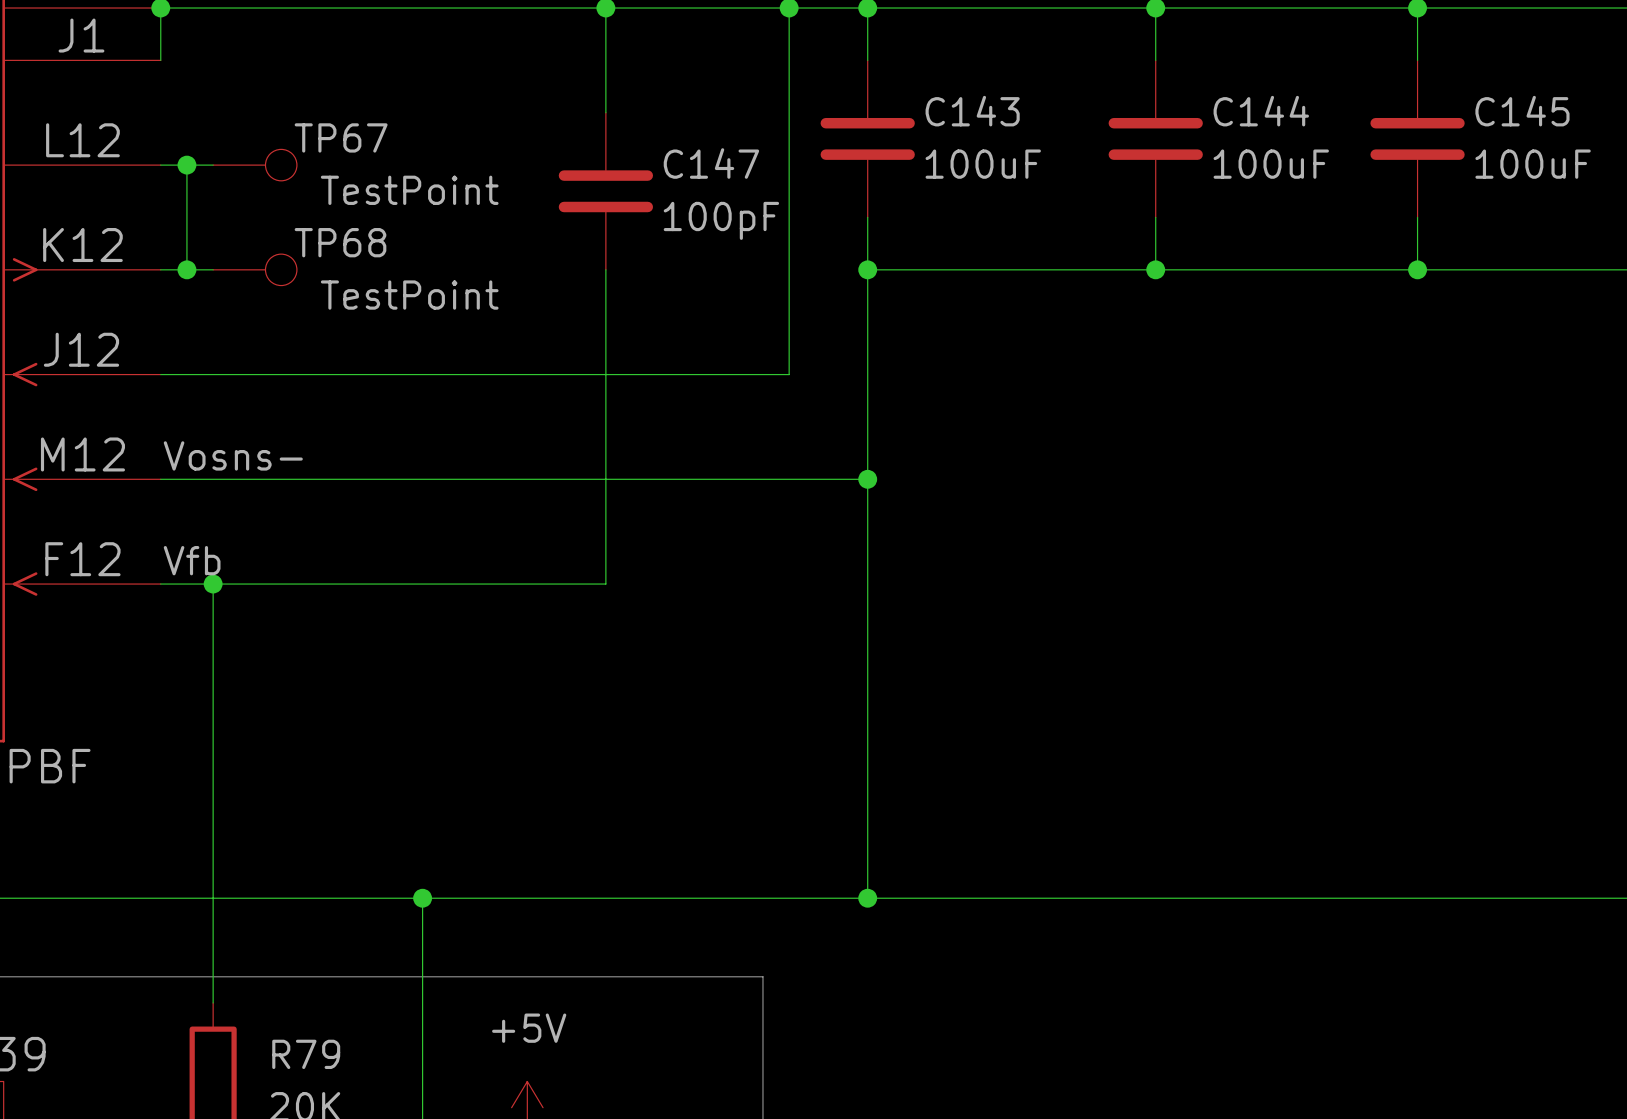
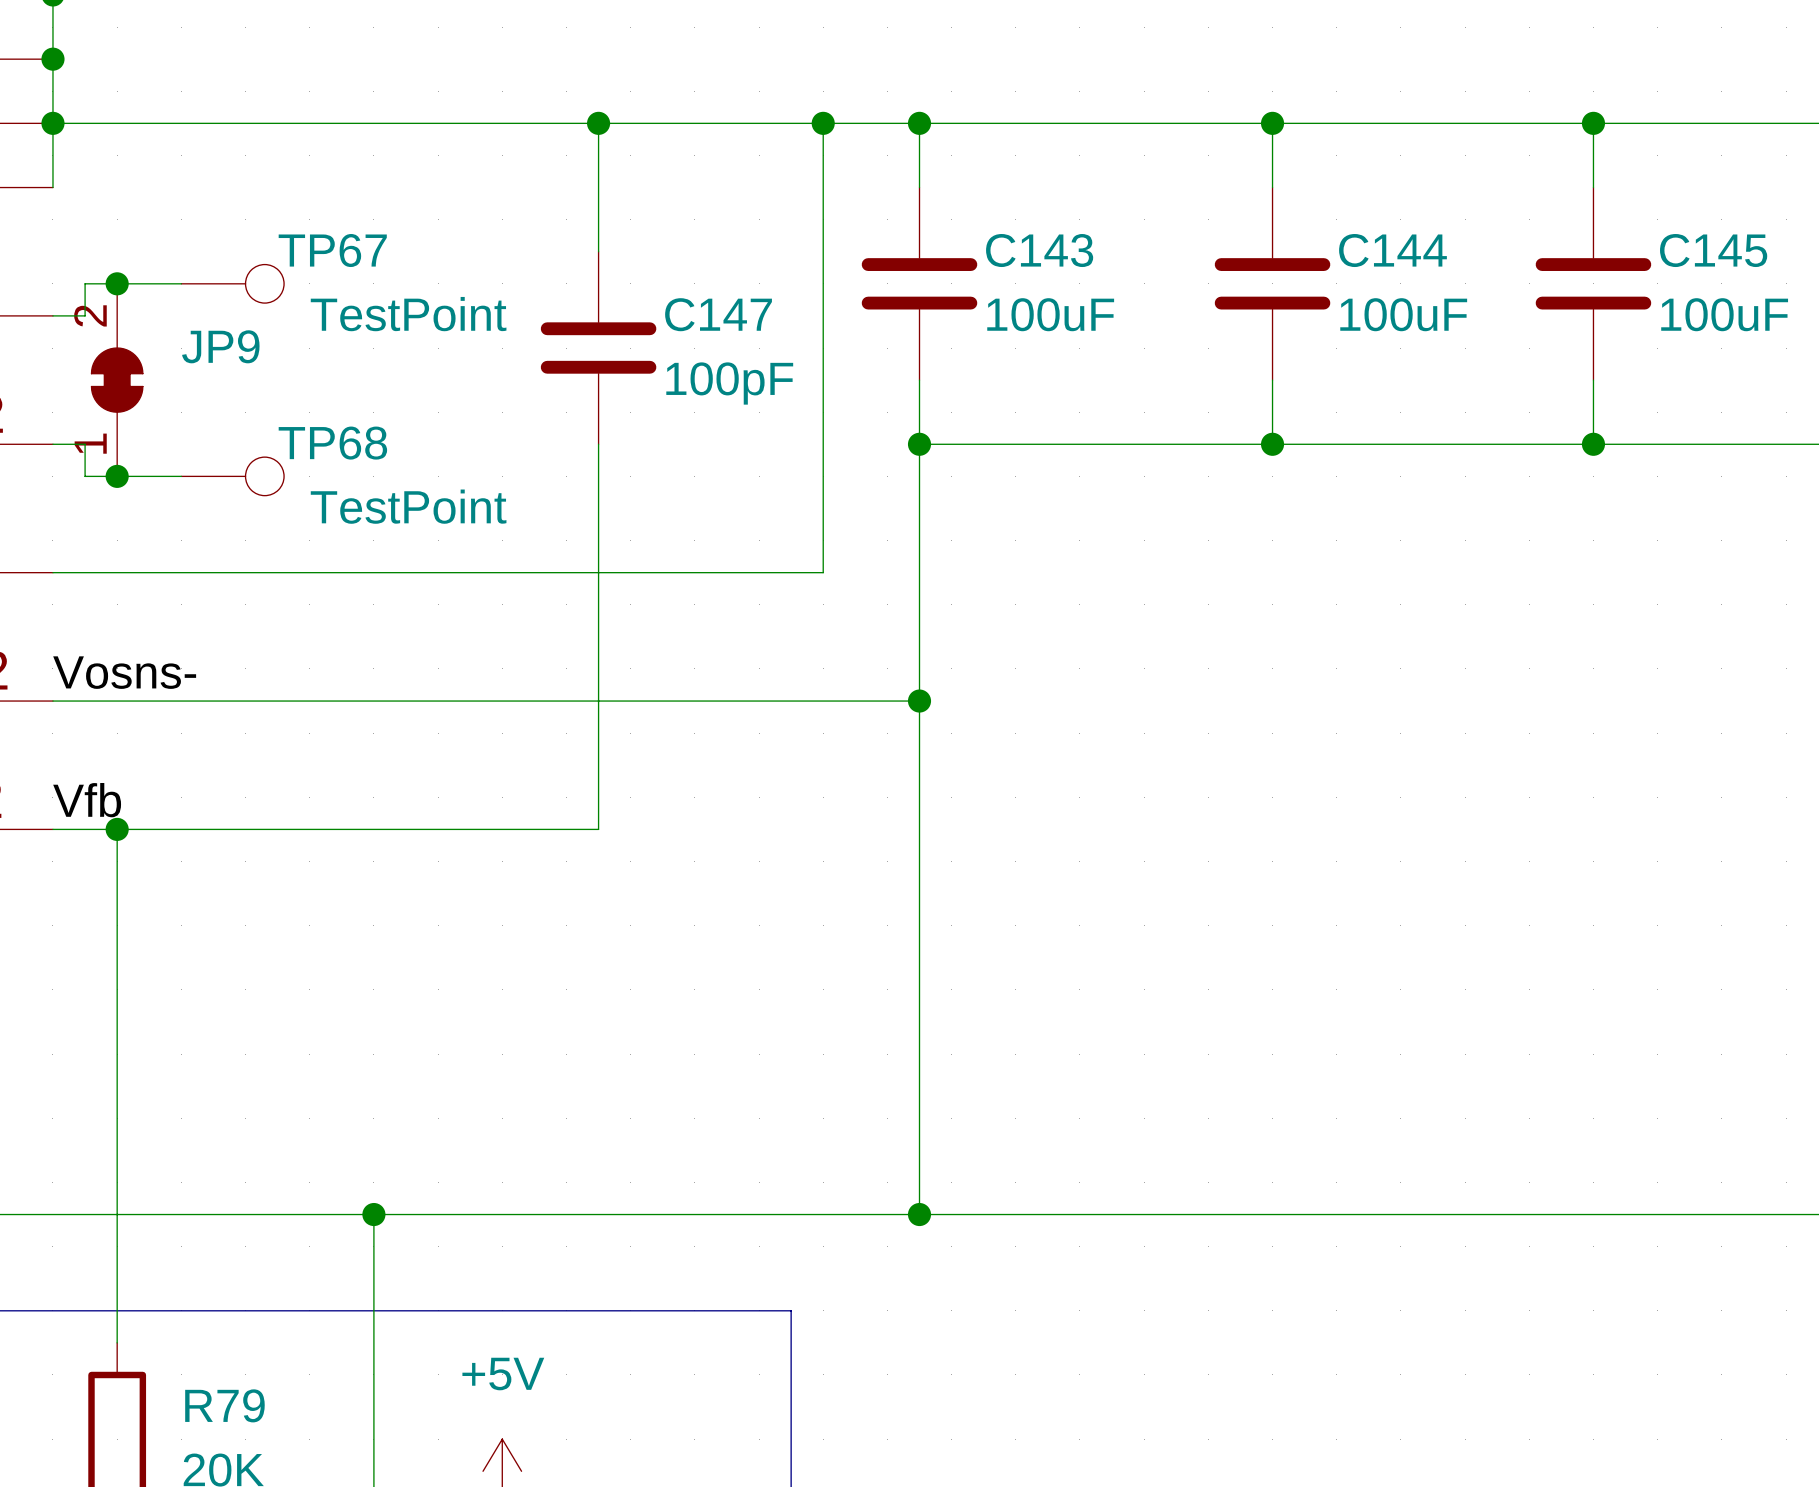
wire: none -> (181, 283) (85, 283) (85, 315)
junction position: (186, 165) -> (117, 283)
wire: (213, 165) (186, 165) (186, 269) (213, 269) -> none
TP67 position: (255, 165) -> (232, 283)
JP9: none -> (117, 380)
wire: none -> (85, 444) (85, 476) (181, 476)
junction position: (186, 269) -> (117, 476)
TP68 position: (255, 269) -> (232, 476)

